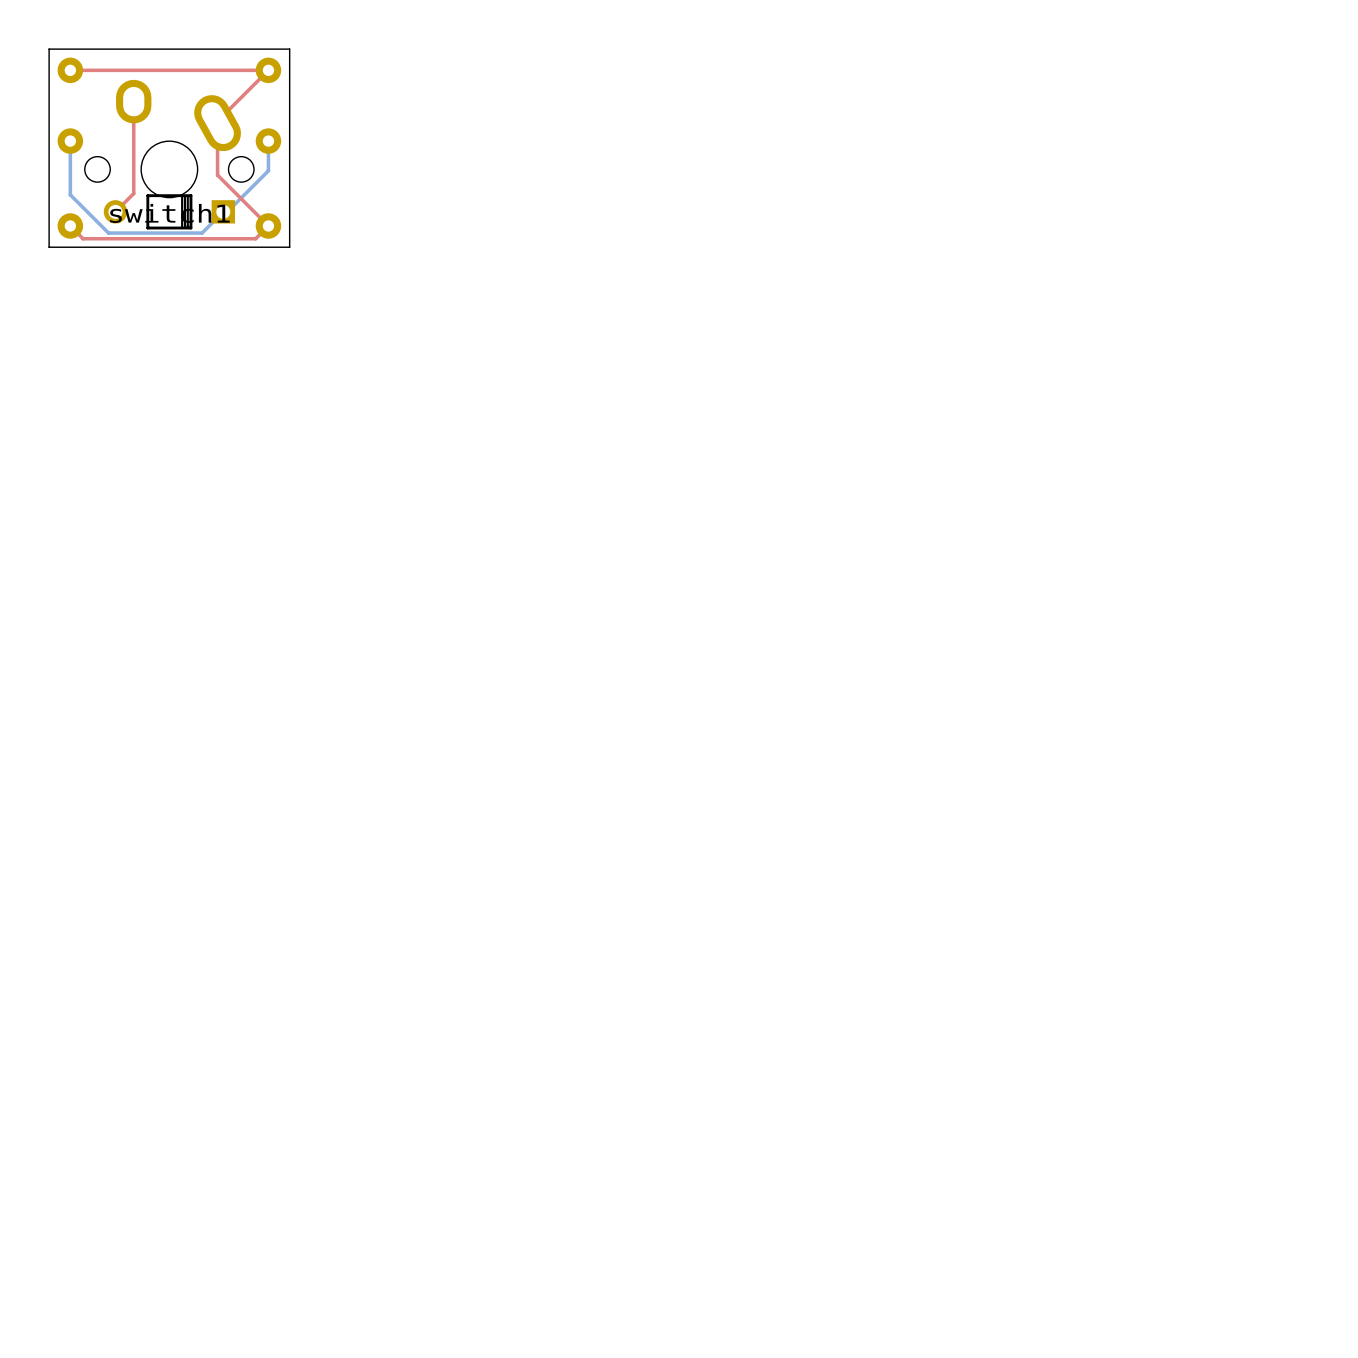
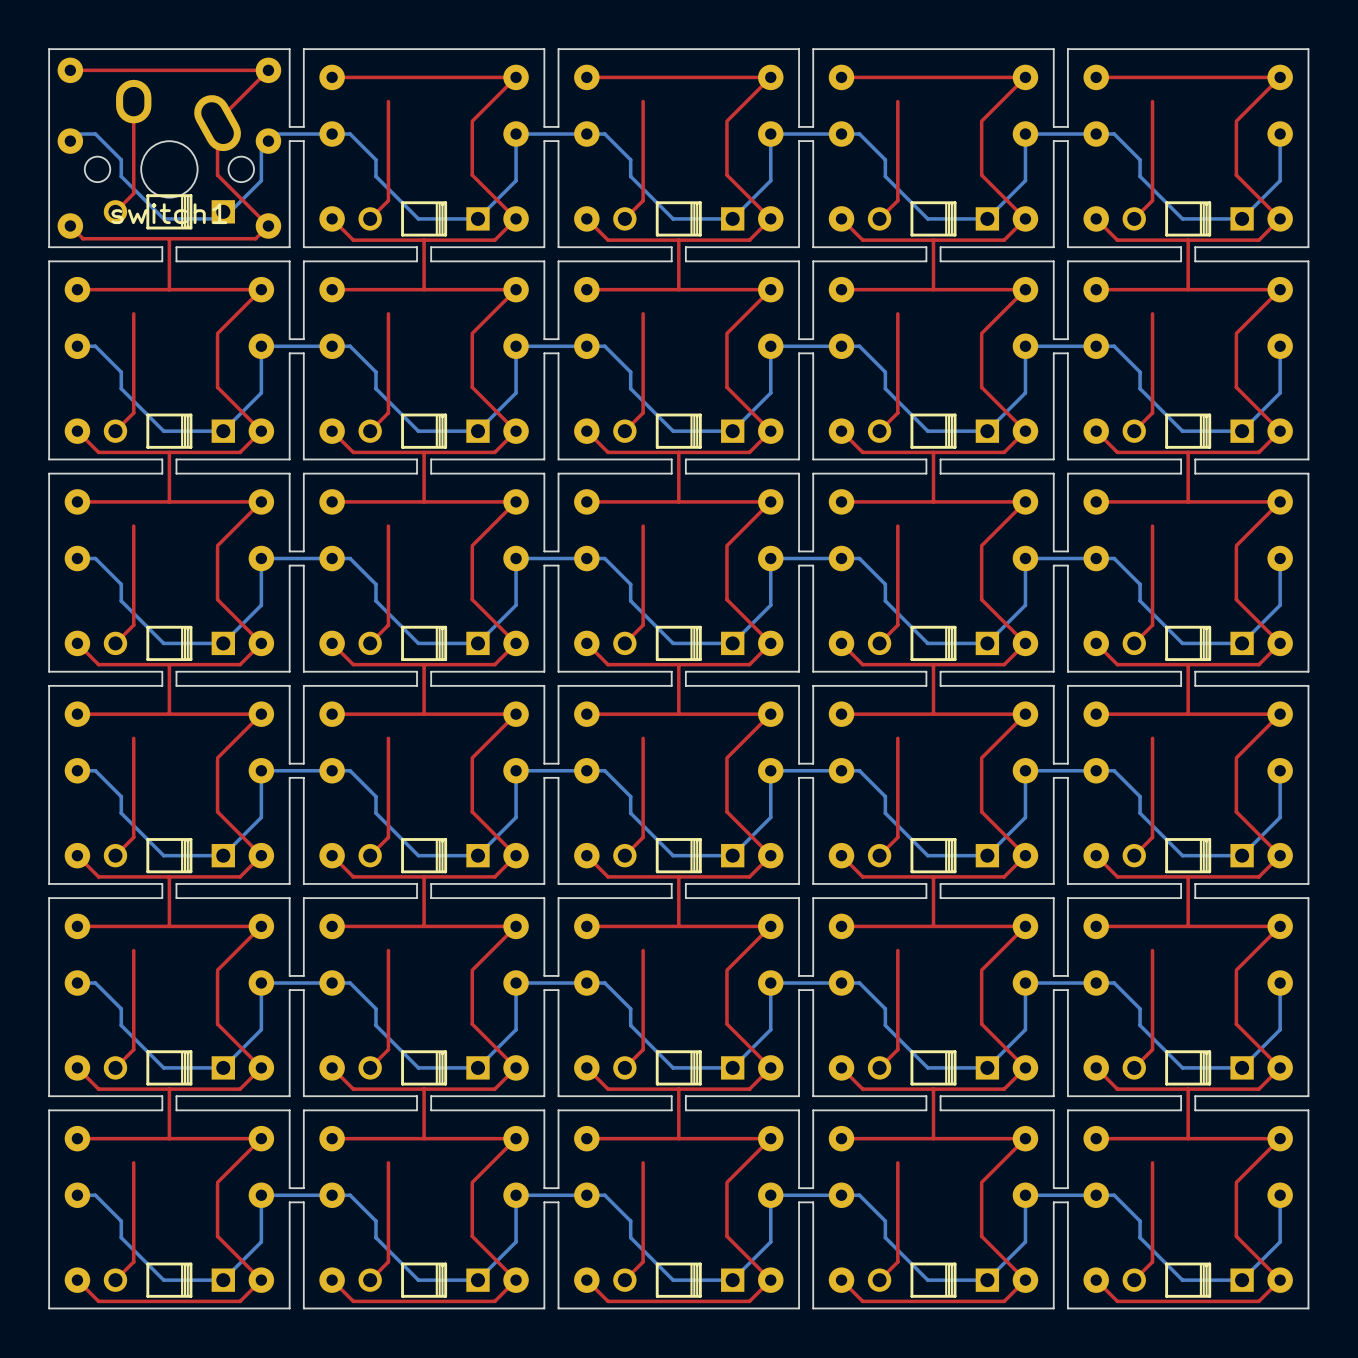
top track: none -> (332, 77) (516, 77) (472, 121)
part: none -> (332, 77)
part: none -> (516, 77)
top track: none -> (586, 77) (770, 77) (726, 121)
part: none -> (586, 77)
part: none -> (770, 77)
top track: none -> (841, 77) (1025, 77) (981, 121)
part: none -> (841, 77)
part: none -> (1025, 77)
top track: none -> (1096, 77) (1280, 77) (1236, 121)
part: none -> (1096, 77)
part: none -> (1280, 77)
top track: none -> (388, 101) (388, 200) (370, 218)
top track: none -> (643, 101) (643, 200) (624, 218)
top track: none -> (897, 101) (897, 200) (879, 218)
top track: none -> (1152, 101) (1152, 200) (1134, 218)
top track: none -> (472, 123) (472, 175) (516, 218) (494, 240) (353, 240) (332, 218)
top track: none -> (726, 123) (726, 175) (770, 218) (749, 240) (608, 240) (586, 218)
top track: none -> (981, 123) (981, 175) (1025, 218) (1004, 240) (862, 240) (841, 218)
top track: none -> (1236, 123) (1236, 175) (1280, 218) (1258, 240) (1117, 240) (1096, 218)
board edge: (289, 126) (289, 141) -> (176, 247) (176, 261) (289, 261) (289, 339) (303, 339) (303, 261) (417, 261) (417, 247) (303, 247) (303, 141) (289, 141)
bottom track: none -> (77, 134) (95, 134) (121, 159) (121, 176) (163, 218) (223, 218)
part: none -> (332, 134)
part: none -> (516, 134)
part: none -> (586, 134)
part: none -> (770, 134)
part: none -> (841, 134)
part: none -> (1025, 134)
part: none -> (1096, 134)
bottom track: none -> (1280, 134) (1280, 180) (1242, 218)
part: none -> (1280, 134)
bottom track: (70, 141) (70, 194) (108, 233) (202, 233) (223, 211) (227, 211) (268, 170) (268, 141) -> none
board edge: none -> (544, 141) (558, 141) (558, 247) (671, 247) (671, 261) (558, 261) (558, 339) (544, 339) (544, 261) (431, 261) (431, 247) (544, 247) (544, 141)
board edge: none -> (799, 141) (813, 141) (813, 247) (926, 247) (926, 261) (813, 261) (813, 339) (799, 339) (799, 261) (685, 261) (685, 247) (799, 247) (799, 141)
board edge: none -> (1053, 141) (1067, 141) (1067, 247) (1181, 247) (1181, 261) (1067, 261) (1067, 339) (1053, 339) (1053, 261) (940, 261) (940, 247) (1053, 247) (1053, 141)
bottom track: none -> (223, 218) (261, 180) (261, 134) (350, 134) (375, 159) (375, 176) (418, 218) (478, 218)
part: none -> (332, 218)
part: none -> (424, 218)
bottom track: none -> (478, 218) (516, 180) (516, 134) (604, 134) (630, 159) (630, 176) (673, 218) (732, 218)
part: none -> (516, 218)
part: none -> (586, 218)
part: none -> (678, 218)
bottom track: none -> (732, 218) (770, 180) (770, 134) (859, 134) (885, 159) (885, 176) (927, 218) (987, 218)
part: none -> (770, 218)
part: none -> (841, 218)
part: none -> (933, 218)
bottom track: none -> (987, 218) (1025, 180) (1025, 134) (1114, 134) (1140, 159) (1140, 176) (1182, 218) (1242, 218)
part: none -> (1025, 218)
part: none -> (1096, 218)
part: none -> (1188, 218)
part: none -> (1280, 218)
top track: none -> (169, 240) (169, 289)
top track: none -> (424, 240) (424, 289)
top track: none -> (678, 240) (678, 289)
top track: none -> (933, 240) (933, 289)
top track: none -> (1188, 240) (1188, 289)
board edge: (162, 247) (176, 247) -> (162, 247) (162, 261) (49, 261) (49, 459) (162, 459) (162, 473) (49, 473) (49, 671) (162, 671) (162, 685) (49, 685) (49, 883) (162, 883) (162, 898) (49, 898) (49, 1096) (162, 1096) (162, 1110) (49, 1110) (49, 1308) (289, 1308) (289, 1202) (303, 1202) (303, 1308) (544, 1308) (544, 1202) (558, 1202) (558, 1308) (799, 1308) (799, 1202) (813, 1202) (813, 1308) (1053, 1308) (1053, 1202) (1067, 1202) (1067, 1308) (1308, 1308) (1308, 1110) (1195, 1110) (1195, 1096) (1308, 1096) (1308, 898) (1195, 898) (1195, 883) (1308, 883) (1308, 685) (1195, 685) (1195, 671) (1308, 671) (1308, 473) (1195, 473) (1195, 459) (1308, 459) (1308, 261) (1195, 261) (1195, 247) (1308, 247) (1308, 49) (1067, 49) (1067, 126) (1053, 126) (1053, 49) (813, 49) (813, 126) (799, 126) (799, 49) (558, 49) (558, 126) (544, 126) (544, 49) (303, 49) (303, 126) (289, 126)
top track: none -> (77, 289) (261, 289) (217, 333)
part: none -> (77, 289)
part: none -> (261, 289)
top track: none -> (332, 289) (516, 289) (472, 333)
part: none -> (332, 289)
part: none -> (516, 289)
top track: none -> (586, 289) (770, 289) (726, 333)
part: none -> (586, 289)
part: none -> (770, 289)
top track: none -> (841, 289) (1025, 289) (981, 333)
part: none -> (841, 289)
part: none -> (1025, 289)
top track: none -> (1096, 289) (1280, 289) (1236, 333)
part: none -> (1096, 289)
part: none -> (1280, 289)
top track: none -> (133, 313) (133, 412) (115, 431)
top track: none -> (388, 313) (388, 412) (370, 431)
top track: none -> (643, 313) (643, 412) (624, 431)
top track: none -> (897, 313) (897, 412) (879, 431)
top track: none -> (1152, 313) (1152, 412) (1134, 431)
top track: none -> (217, 335) (217, 387) (261, 431) (240, 452) (98, 452) (77, 431)
top track: none -> (472, 335) (472, 387) (516, 431) (494, 452) (353, 452) (332, 431)
top track: none -> (726, 335) (726, 387) (770, 431) (749, 452) (608, 452) (586, 431)
top track: none -> (981, 335) (981, 387) (1025, 431) (1004, 452) (862, 452) (841, 431)
top track: none -> (1236, 335) (1236, 387) (1280, 431) (1258, 452) (1117, 452) (1096, 431)
bottom track: none -> (77, 346) (95, 346) (121, 372) (121, 388) (163, 431) (223, 431)
part: none -> (77, 346)
part: none -> (261, 346)
part: none -> (332, 346)
part: none -> (516, 346)
part: none -> (586, 346)
part: none -> (770, 346)
part: none -> (841, 346)
part: none -> (1025, 346)
part: none -> (1096, 346)
bottom track: none -> (1280, 346) (1280, 392) (1242, 431)
part: none -> (1280, 346)
board edge: none -> (289, 353) (289, 459) (176, 459) (176, 473) (289, 473) (289, 551) (303, 551) (303, 473) (417, 473) (417, 459) (303, 459) (303, 353) (289, 353)
board edge: none -> (544, 353) (544, 459) (431, 459) (431, 473) (544, 473) (544, 551) (558, 551) (558, 473) (671, 473) (671, 459) (558, 459) (558, 353) (544, 353)
board edge: none -> (799, 353) (799, 459) (685, 459) (685, 473) (799, 473) (799, 551) (813, 551) (813, 473) (926, 473) (926, 459) (813, 459) (813, 353) (799, 353)
board edge: none -> (1053, 353) (1053, 459) (940, 459) (940, 473) (1053, 473) (1053, 551) (1067, 551) (1067, 473) (1181, 473) (1181, 459) (1067, 459) (1067, 353) (1053, 353)
part: none -> (77, 431)
part: none -> (169, 431)
bottom track: none -> (223, 431) (261, 392) (261, 346) (350, 346) (375, 372) (375, 388) (418, 431) (478, 431)
part: none -> (261, 431)
part: none -> (332, 431)
part: none -> (424, 431)
bottom track: none -> (478, 431) (516, 392) (516, 346) (604, 346) (630, 372) (630, 388) (673, 431) (732, 431)
part: none -> (516, 431)
part: none -> (586, 431)
part: none -> (678, 431)
bottom track: none -> (732, 431) (770, 392) (770, 346) (859, 346) (885, 372) (885, 388) (927, 431) (987, 431)
part: none -> (770, 431)
part: none -> (841, 431)
part: none -> (933, 431)
bottom track: none -> (987, 431) (1025, 392) (1025, 346) (1114, 346) (1140, 372) (1140, 388) (1182, 431) (1242, 431)
part: none -> (1025, 431)
part: none -> (1096, 431)
part: none -> (1188, 431)
part: none -> (1280, 431)
top track: none -> (169, 452) (169, 501)
top track: none -> (424, 452) (424, 501)
top track: none -> (678, 452) (678, 501)
top track: none -> (933, 452) (933, 501)
top track: none -> (1188, 452) (1188, 501)
top track: none -> (77, 501) (261, 501) (217, 545)
part: none -> (77, 501)
part: none -> (261, 501)
top track: none -> (332, 501) (516, 501) (472, 545)
part: none -> (332, 501)
part: none -> (516, 501)
top track: none -> (586, 501) (770, 501) (726, 545)
part: none -> (586, 501)
part: none -> (770, 501)
top track: none -> (841, 501) (1025, 501) (981, 545)
part: none -> (841, 501)
part: none -> (1025, 501)
top track: none -> (1096, 501) (1280, 501) (1236, 545)
part: none -> (1096, 501)
part: none -> (1280, 501)
top track: none -> (133, 526) (133, 625) (115, 643)
top track: none -> (388, 526) (388, 625) (370, 643)
top track: none -> (643, 526) (643, 625) (624, 643)
top track: none -> (897, 526) (897, 625) (879, 643)
top track: none -> (1152, 526) (1152, 625) (1134, 643)
top track: none -> (217, 547) (217, 599) (261, 643) (240, 664) (98, 664) (77, 643)
top track: none -> (472, 547) (472, 599) (516, 643) (494, 664) (353, 664) (332, 643)
top track: none -> (726, 547) (726, 599) (770, 643) (749, 664) (608, 664) (586, 643)
top track: none -> (981, 547) (981, 599) (1025, 643) (1004, 664) (862, 664) (841, 643)
top track: none -> (1236, 547) (1236, 599) (1280, 643) (1258, 664) (1117, 664) (1096, 643)
bottom track: none -> (77, 558) (95, 558) (121, 584) (121, 600) (163, 643) (223, 643)
part: none -> (77, 558)
part: none -> (261, 558)
part: none -> (332, 558)
part: none -> (516, 558)
part: none -> (586, 558)
part: none -> (770, 558)
part: none -> (841, 558)
part: none -> (1025, 558)
part: none -> (1096, 558)
bottom track: none -> (1280, 558) (1280, 605) (1242, 643)
part: none -> (1280, 558)
board edge: none -> (289, 565) (289, 671) (176, 671) (176, 685) (289, 685) (289, 763) (303, 763) (303, 685) (417, 685) (417, 671) (303, 671) (303, 565) (289, 565)
board edge: none -> (544, 565) (544, 671) (431, 671) (431, 685) (544, 685) (544, 763) (558, 763) (558, 685) (671, 685) (671, 671) (558, 671) (558, 565) (544, 565)
board edge: none -> (799, 565) (799, 671) (685, 671) (685, 685) (799, 685) (799, 763) (813, 763) (813, 685) (926, 685) (926, 671) (813, 671) (813, 565) (799, 565)
board edge: none -> (1053, 565) (1053, 671) (940, 671) (940, 685) (1053, 685) (1053, 763) (1067, 763) (1067, 685) (1181, 685) (1181, 671) (1067, 671) (1067, 565) (1053, 565)
part: none -> (77, 643)
part: none -> (169, 643)
bottom track: none -> (223, 643) (261, 605) (261, 558) (350, 558) (375, 584) (375, 600) (418, 643) (478, 643)
part: none -> (261, 643)
part: none -> (332, 643)
part: none -> (424, 643)
bottom track: none -> (478, 643) (516, 605) (516, 558) (604, 558) (630, 584) (630, 600) (673, 643) (732, 643)
part: none -> (516, 643)
part: none -> (586, 643)
part: none -> (678, 643)
bottom track: none -> (732, 643) (770, 605) (770, 558) (859, 558) (885, 584) (885, 600) (927, 643) (987, 643)
part: none -> (770, 643)
part: none -> (841, 643)
part: none -> (933, 643)
bottom track: none -> (987, 643) (1025, 605) (1025, 558) (1114, 558) (1140, 584) (1140, 600) (1182, 643) (1242, 643)
part: none -> (1025, 643)
part: none -> (1096, 643)
part: none -> (1188, 643)
part: none -> (1280, 643)
top track: none -> (169, 664) (169, 714)
top track: none -> (424, 664) (424, 714)
top track: none -> (678, 664) (678, 714)
top track: none -> (933, 664) (933, 714)
top track: none -> (1188, 664) (1188, 714)
top track: none -> (77, 714) (261, 714) (217, 757)
part: none -> (77, 714)
part: none -> (261, 714)
top track: none -> (332, 714) (516, 714) (472, 757)
part: none -> (332, 714)
part: none -> (516, 714)
top track: none -> (586, 714) (770, 714) (726, 757)
part: none -> (586, 714)
part: none -> (770, 714)
top track: none -> (841, 714) (1025, 714) (981, 757)
part: none -> (841, 714)
part: none -> (1025, 714)
top track: none -> (1096, 714) (1280, 714) (1236, 757)
part: none -> (1096, 714)
part: none -> (1280, 714)
top track: none -> (133, 738) (133, 837) (115, 855)
top track: none -> (388, 738) (388, 837) (370, 855)
top track: none -> (643, 738) (643, 837) (624, 855)
top track: none -> (897, 738) (897, 837) (879, 855)
top track: none -> (1152, 738) (1152, 837) (1134, 855)
top track: none -> (217, 759) (217, 811) (261, 855) (240, 876) (98, 876) (77, 855)
top track: none -> (472, 759) (472, 811) (516, 855) (494, 876) (353, 876) (332, 855)
top track: none -> (726, 759) (726, 811) (770, 855) (749, 876) (608, 876) (586, 855)
top track: none -> (981, 759) (981, 811) (1025, 855) (1004, 876) (862, 876) (841, 855)
top track: none -> (1236, 759) (1236, 811) (1280, 855) (1258, 876) (1117, 876) (1096, 855)
bottom track: none -> (77, 770) (95, 770) (121, 796) (121, 813) (163, 855) (223, 855)
part: none -> (77, 770)
part: none -> (261, 770)
part: none -> (332, 770)
part: none -> (516, 770)
part: none -> (586, 770)
part: none -> (770, 770)
part: none -> (841, 770)
part: none -> (1025, 770)
part: none -> (1096, 770)
bottom track: none -> (1280, 770) (1280, 817) (1242, 855)
part: none -> (1280, 770)
board edge: none -> (289, 777) (289, 883) (176, 883) (176, 898) (289, 898) (289, 975) (303, 975) (303, 898) (417, 898) (417, 883) (303, 883) (303, 777) (289, 777)
board edge: none -> (544, 777) (544, 883) (431, 883) (431, 898) (544, 898) (544, 975) (558, 975) (558, 898) (671, 898) (671, 883) (558, 883) (558, 777) (544, 777)
board edge: none -> (799, 777) (799, 883) (685, 883) (685, 898) (799, 898) (799, 975) (813, 975) (813, 898) (926, 898) (926, 883) (813, 883) (813, 777) (799, 777)
board edge: none -> (1053, 777) (1053, 883) (940, 883) (940, 898) (1053, 898) (1053, 975) (1067, 975) (1067, 898) (1181, 898) (1181, 883) (1067, 883) (1067, 777) (1053, 777)
part: none -> (77, 855)
part: none -> (169, 855)
bottom track: none -> (223, 855) (261, 817) (261, 770) (350, 770) (375, 796) (375, 813) (418, 855) (478, 855)
part: none -> (261, 855)
part: none -> (332, 855)
part: none -> (424, 855)
bottom track: none -> (478, 855) (516, 817) (516, 770) (604, 770) (630, 796) (630, 813) (673, 855) (732, 855)
part: none -> (516, 855)
part: none -> (586, 855)
part: none -> (678, 855)
bottom track: none -> (732, 855) (770, 817) (770, 770) (859, 770) (885, 796) (885, 813) (927, 855) (987, 855)
part: none -> (770, 855)
part: none -> (841, 855)
part: none -> (933, 855)
bottom track: none -> (987, 855) (1025, 817) (1025, 770) (1114, 770) (1140, 796) (1140, 813) (1182, 855) (1242, 855)
part: none -> (1025, 855)
part: none -> (1096, 855)
part: none -> (1188, 855)
part: none -> (1280, 855)
top track: none -> (169, 876) (169, 926)
top track: none -> (424, 876) (424, 926)
top track: none -> (678, 876) (678, 926)
top track: none -> (933, 876) (933, 926)
top track: none -> (1188, 876) (1188, 926)
top track: none -> (77, 926) (261, 926) (217, 970)
part: none -> (77, 926)
part: none -> (261, 926)
top track: none -> (332, 926) (516, 926) (472, 970)
part: none -> (332, 926)
part: none -> (516, 926)
top track: none -> (586, 926) (770, 926) (726, 970)
part: none -> (586, 926)
part: none -> (770, 926)
top track: none -> (841, 926) (1025, 926) (981, 970)
part: none -> (841, 926)
part: none -> (1025, 926)
top track: none -> (1096, 926) (1280, 926) (1236, 970)
part: none -> (1096, 926)
part: none -> (1280, 926)
top track: none -> (133, 950) (133, 1049) (115, 1067)
top track: none -> (388, 950) (388, 1049) (370, 1067)
top track: none -> (643, 950) (643, 1049) (624, 1067)
top track: none -> (897, 950) (897, 1049) (879, 1067)
top track: none -> (1152, 950) (1152, 1049) (1134, 1067)
top track: none -> (217, 972) (217, 1024) (261, 1067) (240, 1089) (98, 1089) (77, 1067)
top track: none -> (472, 972) (472, 1024) (516, 1067) (494, 1089) (353, 1089) (332, 1067)
top track: none -> (726, 972) (726, 1024) (770, 1067) (749, 1089) (608, 1089) (586, 1067)
top track: none -> (981, 972) (981, 1024) (1025, 1067) (1004, 1089) (862, 1089) (841, 1067)
top track: none -> (1236, 972) (1236, 1024) (1280, 1067) (1258, 1089) (1117, 1089) (1096, 1067)
bottom track: none -> (77, 983) (95, 983) (121, 1008) (121, 1025) (163, 1067) (223, 1067)
part: none -> (77, 983)
part: none -> (261, 983)
part: none -> (332, 983)
part: none -> (516, 983)
part: none -> (586, 983)
part: none -> (770, 983)
part: none -> (841, 983)
part: none -> (1025, 983)
part: none -> (1096, 983)
bottom track: none -> (1280, 983) (1280, 1029) (1242, 1067)
part: none -> (1280, 983)
board edge: none -> (289, 990) (289, 1096) (176, 1096) (176, 1110) (289, 1110) (289, 1188) (303, 1188) (303, 1110) (417, 1110) (417, 1096) (303, 1096) (303, 990) (289, 990)
board edge: none -> (544, 990) (544, 1096) (431, 1096) (431, 1110) (544, 1110) (544, 1188) (558, 1188) (558, 1110) (671, 1110) (671, 1096) (558, 1096) (558, 990) (544, 990)
board edge: none -> (799, 990) (799, 1096) (685, 1096) (685, 1110) (799, 1110) (799, 1188) (813, 1188) (813, 1110) (926, 1110) (926, 1096) (813, 1096) (813, 990) (799, 990)
board edge: none -> (1053, 990) (1053, 1096) (940, 1096) (940, 1110) (1053, 1110) (1053, 1188) (1067, 1188) (1067, 1110) (1181, 1110) (1181, 1096) (1067, 1096) (1067, 990) (1053, 990)
part: none -> (77, 1067)
part: none -> (169, 1067)
bottom track: none -> (223, 1067) (261, 1029) (261, 983) (350, 983) (375, 1008) (375, 1025) (418, 1067) (478, 1067)
part: none -> (261, 1067)
part: none -> (332, 1067)
part: none -> (424, 1067)
bottom track: none -> (478, 1067) (516, 1029) (516, 983) (604, 983) (630, 1008) (630, 1025) (673, 1067) (732, 1067)
part: none -> (516, 1067)
part: none -> (586, 1067)
part: none -> (678, 1067)
bottom track: none -> (732, 1067) (770, 1029) (770, 983) (859, 983) (885, 1008) (885, 1025) (927, 1067) (987, 1067)
part: none -> (770, 1067)
part: none -> (841, 1067)
part: none -> (933, 1067)
bottom track: none -> (987, 1067) (1025, 1029) (1025, 983) (1114, 983) (1140, 1008) (1140, 1025) (1182, 1067) (1242, 1067)
part: none -> (1025, 1067)
part: none -> (1096, 1067)
part: none -> (1188, 1067)
part: none -> (1280, 1067)
top track: none -> (169, 1089) (169, 1138)
top track: none -> (424, 1089) (424, 1138)
top track: none -> (678, 1089) (678, 1138)
top track: none -> (933, 1089) (933, 1138)
top track: none -> (1188, 1089) (1188, 1138)
top track: none -> (77, 1138) (261, 1138) (217, 1182)
part: none -> (77, 1138)
part: none -> (261, 1138)
top track: none -> (332, 1138) (516, 1138) (472, 1182)
part: none -> (332, 1138)
part: none -> (516, 1138)
top track: none -> (586, 1138) (770, 1138) (726, 1182)
part: none -> (586, 1138)
part: none -> (770, 1138)
top track: none -> (841, 1138) (1025, 1138) (981, 1182)
part: none -> (841, 1138)
part: none -> (1025, 1138)
top track: none -> (1096, 1138) (1280, 1138) (1236, 1182)
part: none -> (1096, 1138)
part: none -> (1280, 1138)
top track: none -> (133, 1162) (133, 1261) (115, 1280)
top track: none -> (388, 1162) (388, 1261) (370, 1280)
top track: none -> (643, 1162) (643, 1261) (624, 1280)
top track: none -> (897, 1162) (897, 1261) (879, 1280)
top track: none -> (1152, 1162) (1152, 1261) (1134, 1280)
top track: none -> (217, 1184) (217, 1236) (261, 1280) (240, 1301) (98, 1301) (77, 1280)
top track: none -> (472, 1184) (472, 1236) (516, 1280) (494, 1301) (353, 1301) (332, 1280)
top track: none -> (726, 1184) (726, 1236) (770, 1280) (749, 1301) (608, 1301) (586, 1280)
top track: none -> (981, 1184) (981, 1236) (1025, 1280) (1004, 1301) (862, 1301) (841, 1280)
top track: none -> (1236, 1184) (1236, 1236) (1280, 1280) (1258, 1301) (1117, 1301) (1096, 1280)
bottom track: none -> (77, 1195) (95, 1195) (121, 1221) (121, 1237) (163, 1280) (223, 1280)
part: none -> (77, 1195)
part: none -> (261, 1195)
part: none -> (332, 1195)
part: none -> (516, 1195)
part: none -> (586, 1195)
part: none -> (770, 1195)
part: none -> (841, 1195)
part: none -> (1025, 1195)
part: none -> (1096, 1195)
bottom track: none -> (1280, 1195) (1280, 1241) (1242, 1280)
part: none -> (1280, 1195)
part: none -> (77, 1280)
part: none -> (169, 1280)
bottom track: none -> (223, 1280) (261, 1241) (261, 1195) (350, 1195) (375, 1221) (375, 1237) (418, 1280) (478, 1280)
part: none -> (261, 1280)
part: none -> (332, 1280)
part: none -> (424, 1280)
bottom track: none -> (478, 1280) (516, 1241) (516, 1195) (604, 1195) (630, 1221) (630, 1237) (673, 1280) (732, 1280)
part: none -> (516, 1280)
part: none -> (586, 1280)
part: none -> (678, 1280)
bottom track: none -> (732, 1280) (770, 1241) (770, 1195) (859, 1195) (885, 1221) (885, 1237) (927, 1280) (987, 1280)
part: none -> (770, 1280)
part: none -> (841, 1280)
part: none -> (933, 1280)
bottom track: none -> (987, 1280) (1025, 1241) (1025, 1195) (1114, 1195) (1140, 1221) (1140, 1237) (1182, 1280) (1242, 1280)
part: none -> (1025, 1280)
part: none -> (1096, 1280)
part: none -> (1188, 1280)
part: none -> (1280, 1280)

